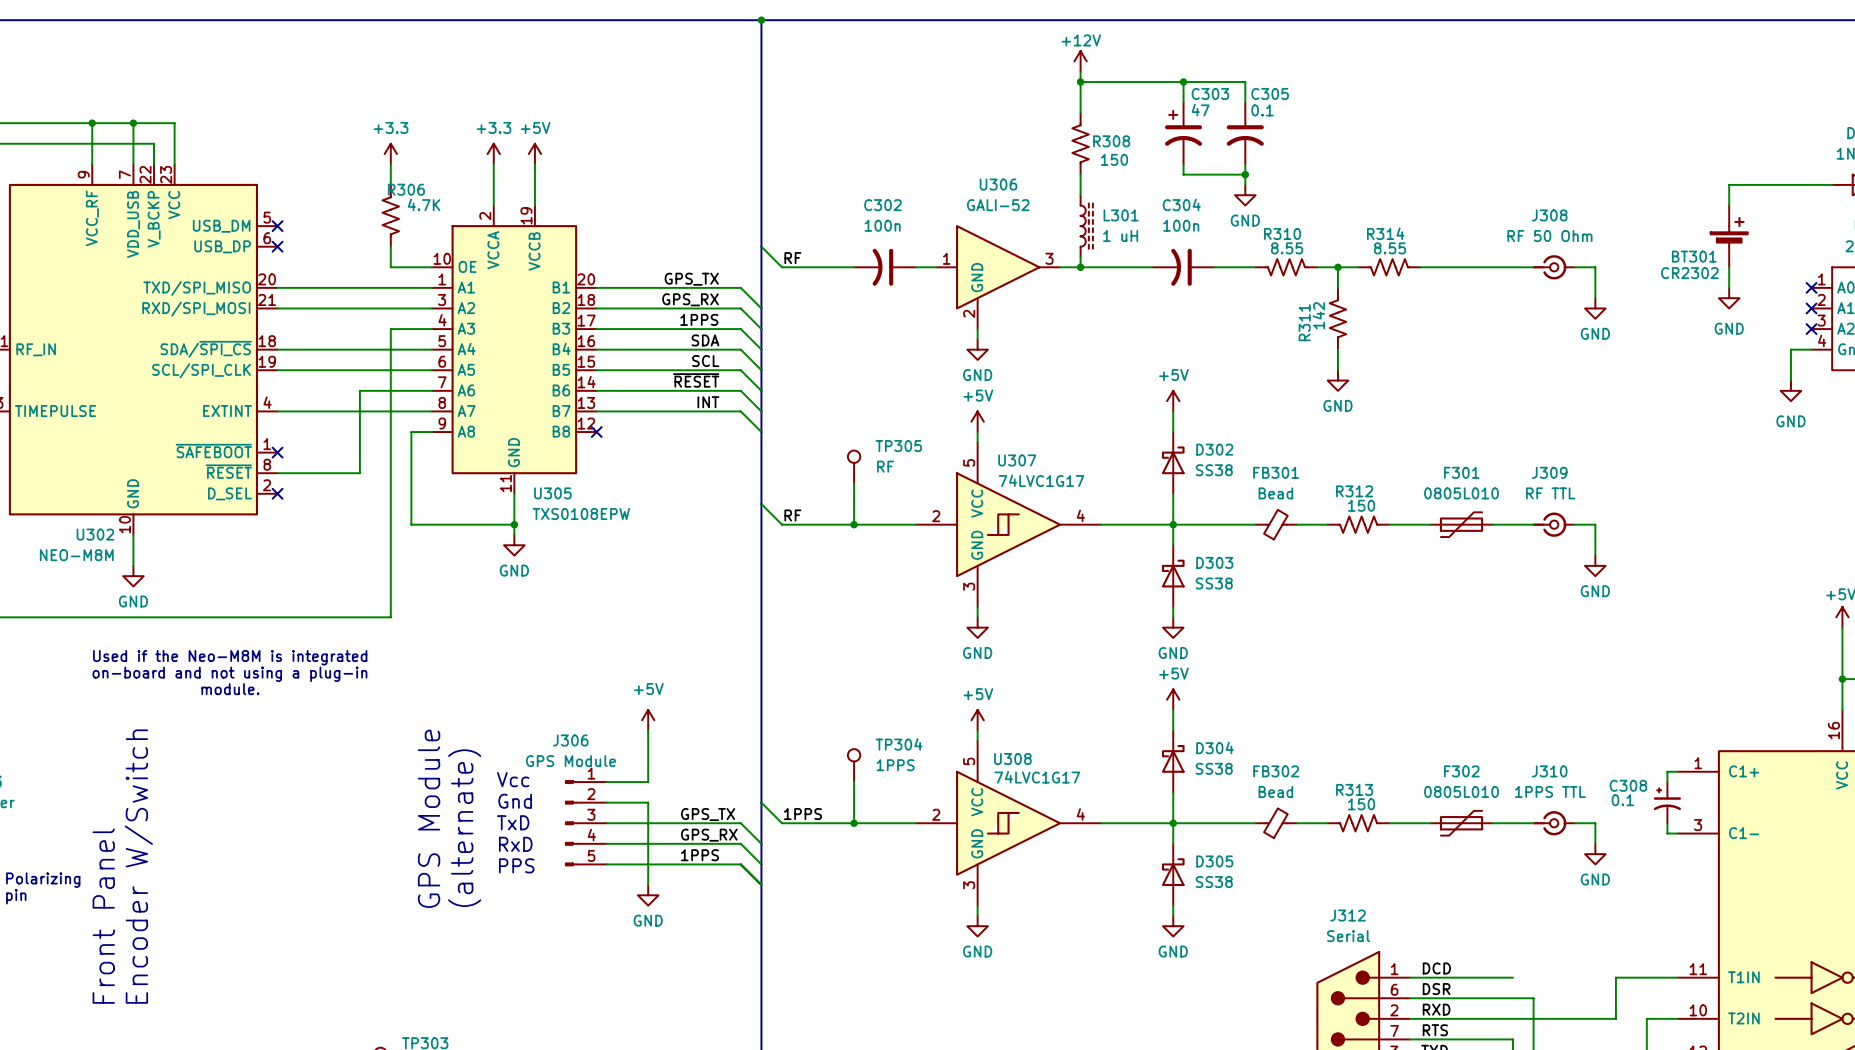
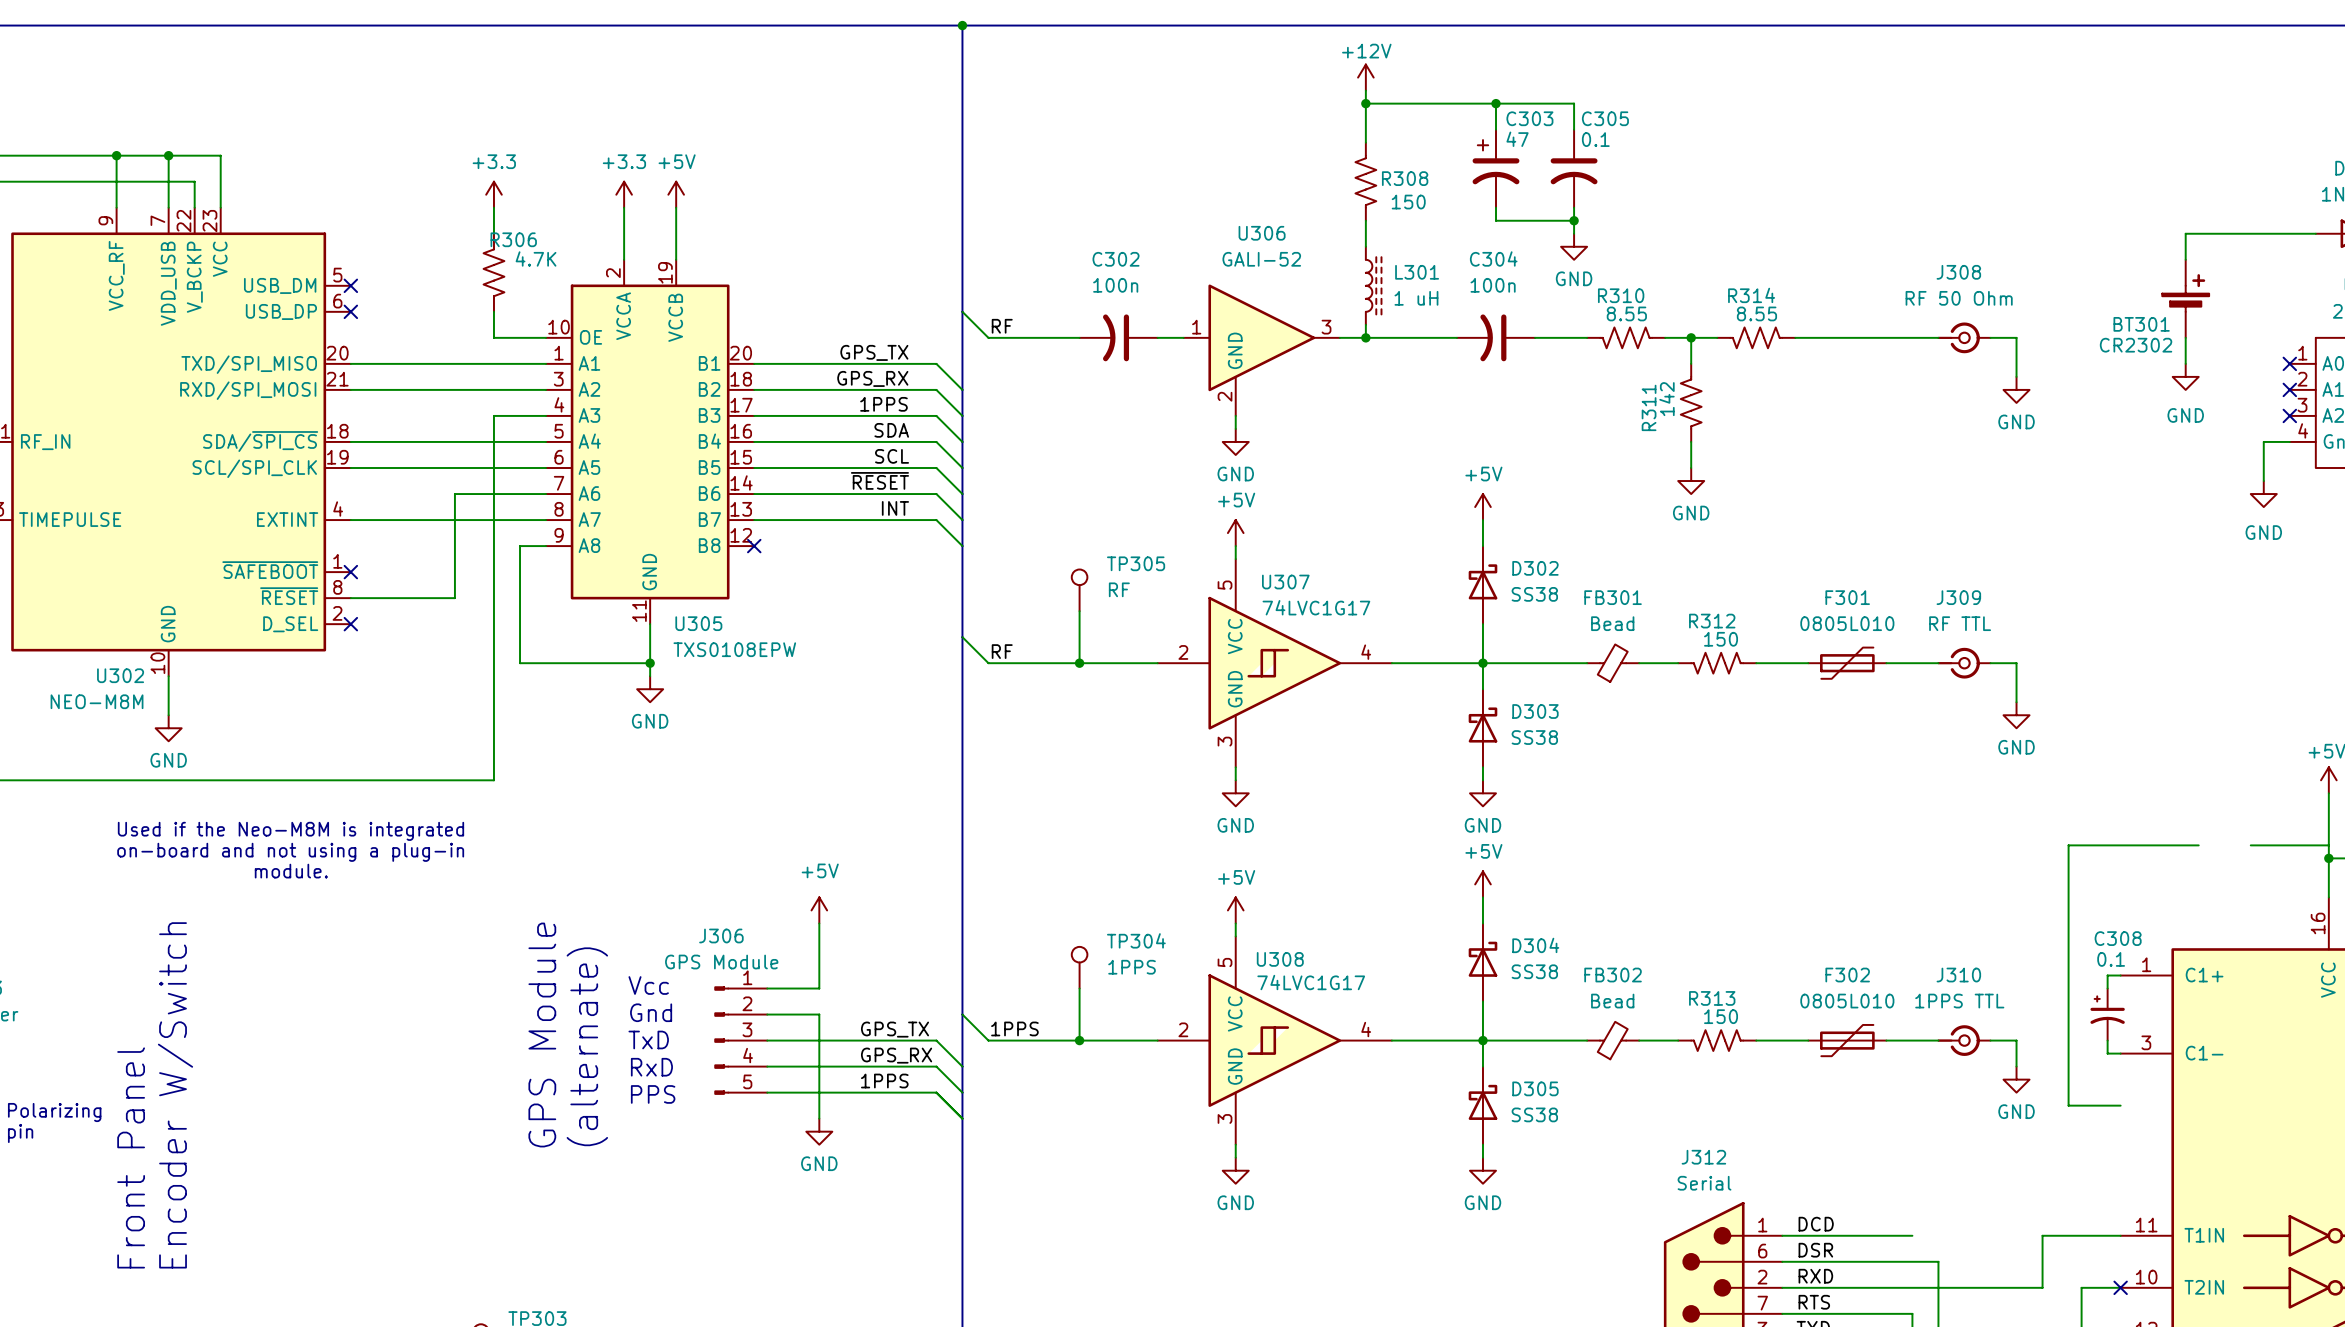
wire: none -> (2198, 845) (2068, 845) (2068, 1105) (2120, 1105)
wire: none -> (2250, 845) (2328, 845)
C308 name position: C308 (1628, 785) -> C308 (2118, 938)
C308 value position: 0.1 (1622, 800) -> 0.1 (2111, 959)
no-connect mark: none -> (2120, 1287)

